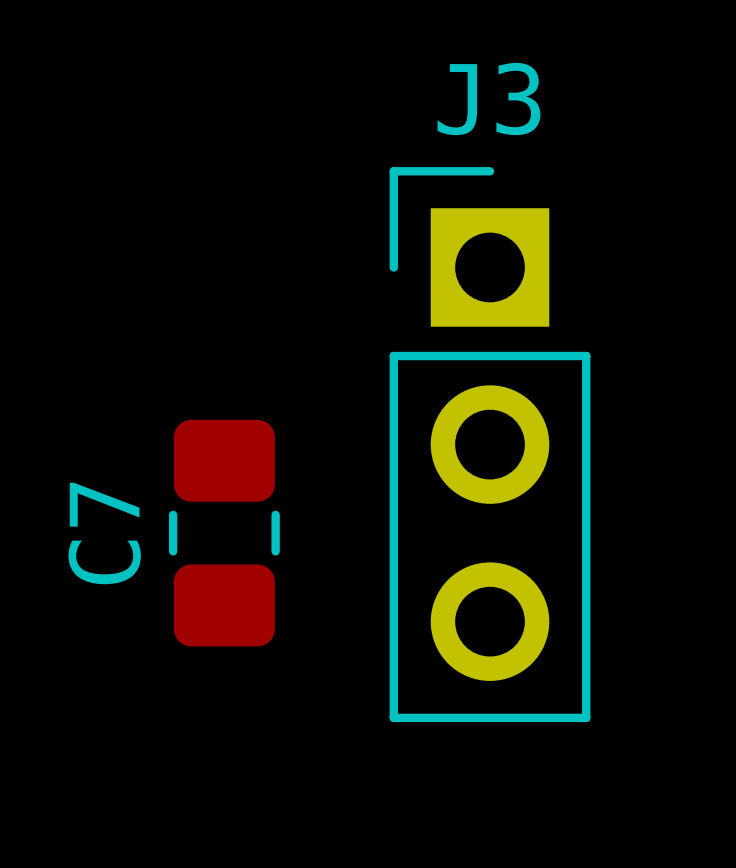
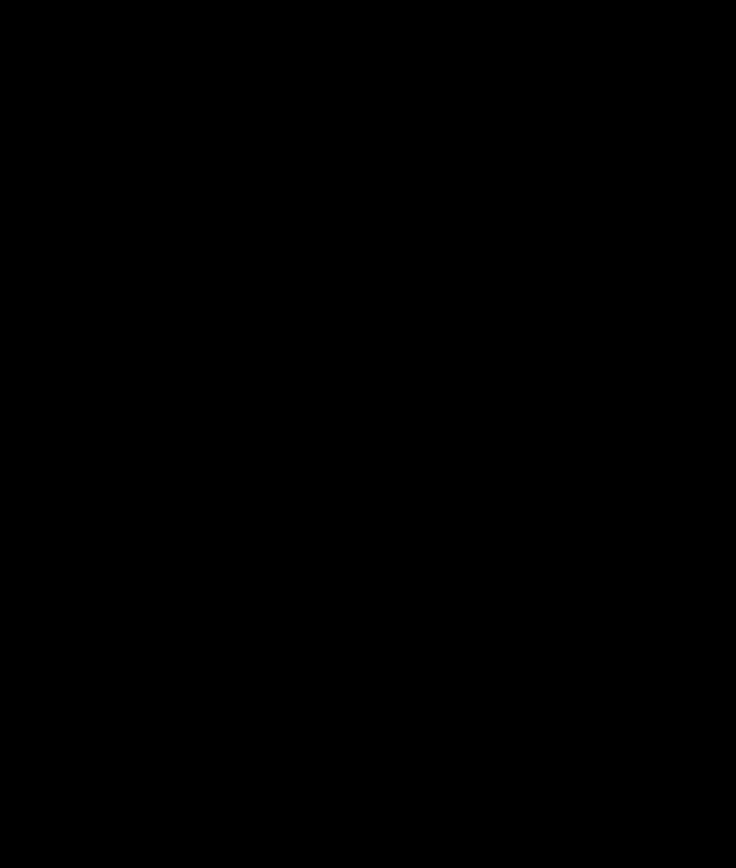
J3: (490, 444) -> none
C7: (224, 533) -> none

